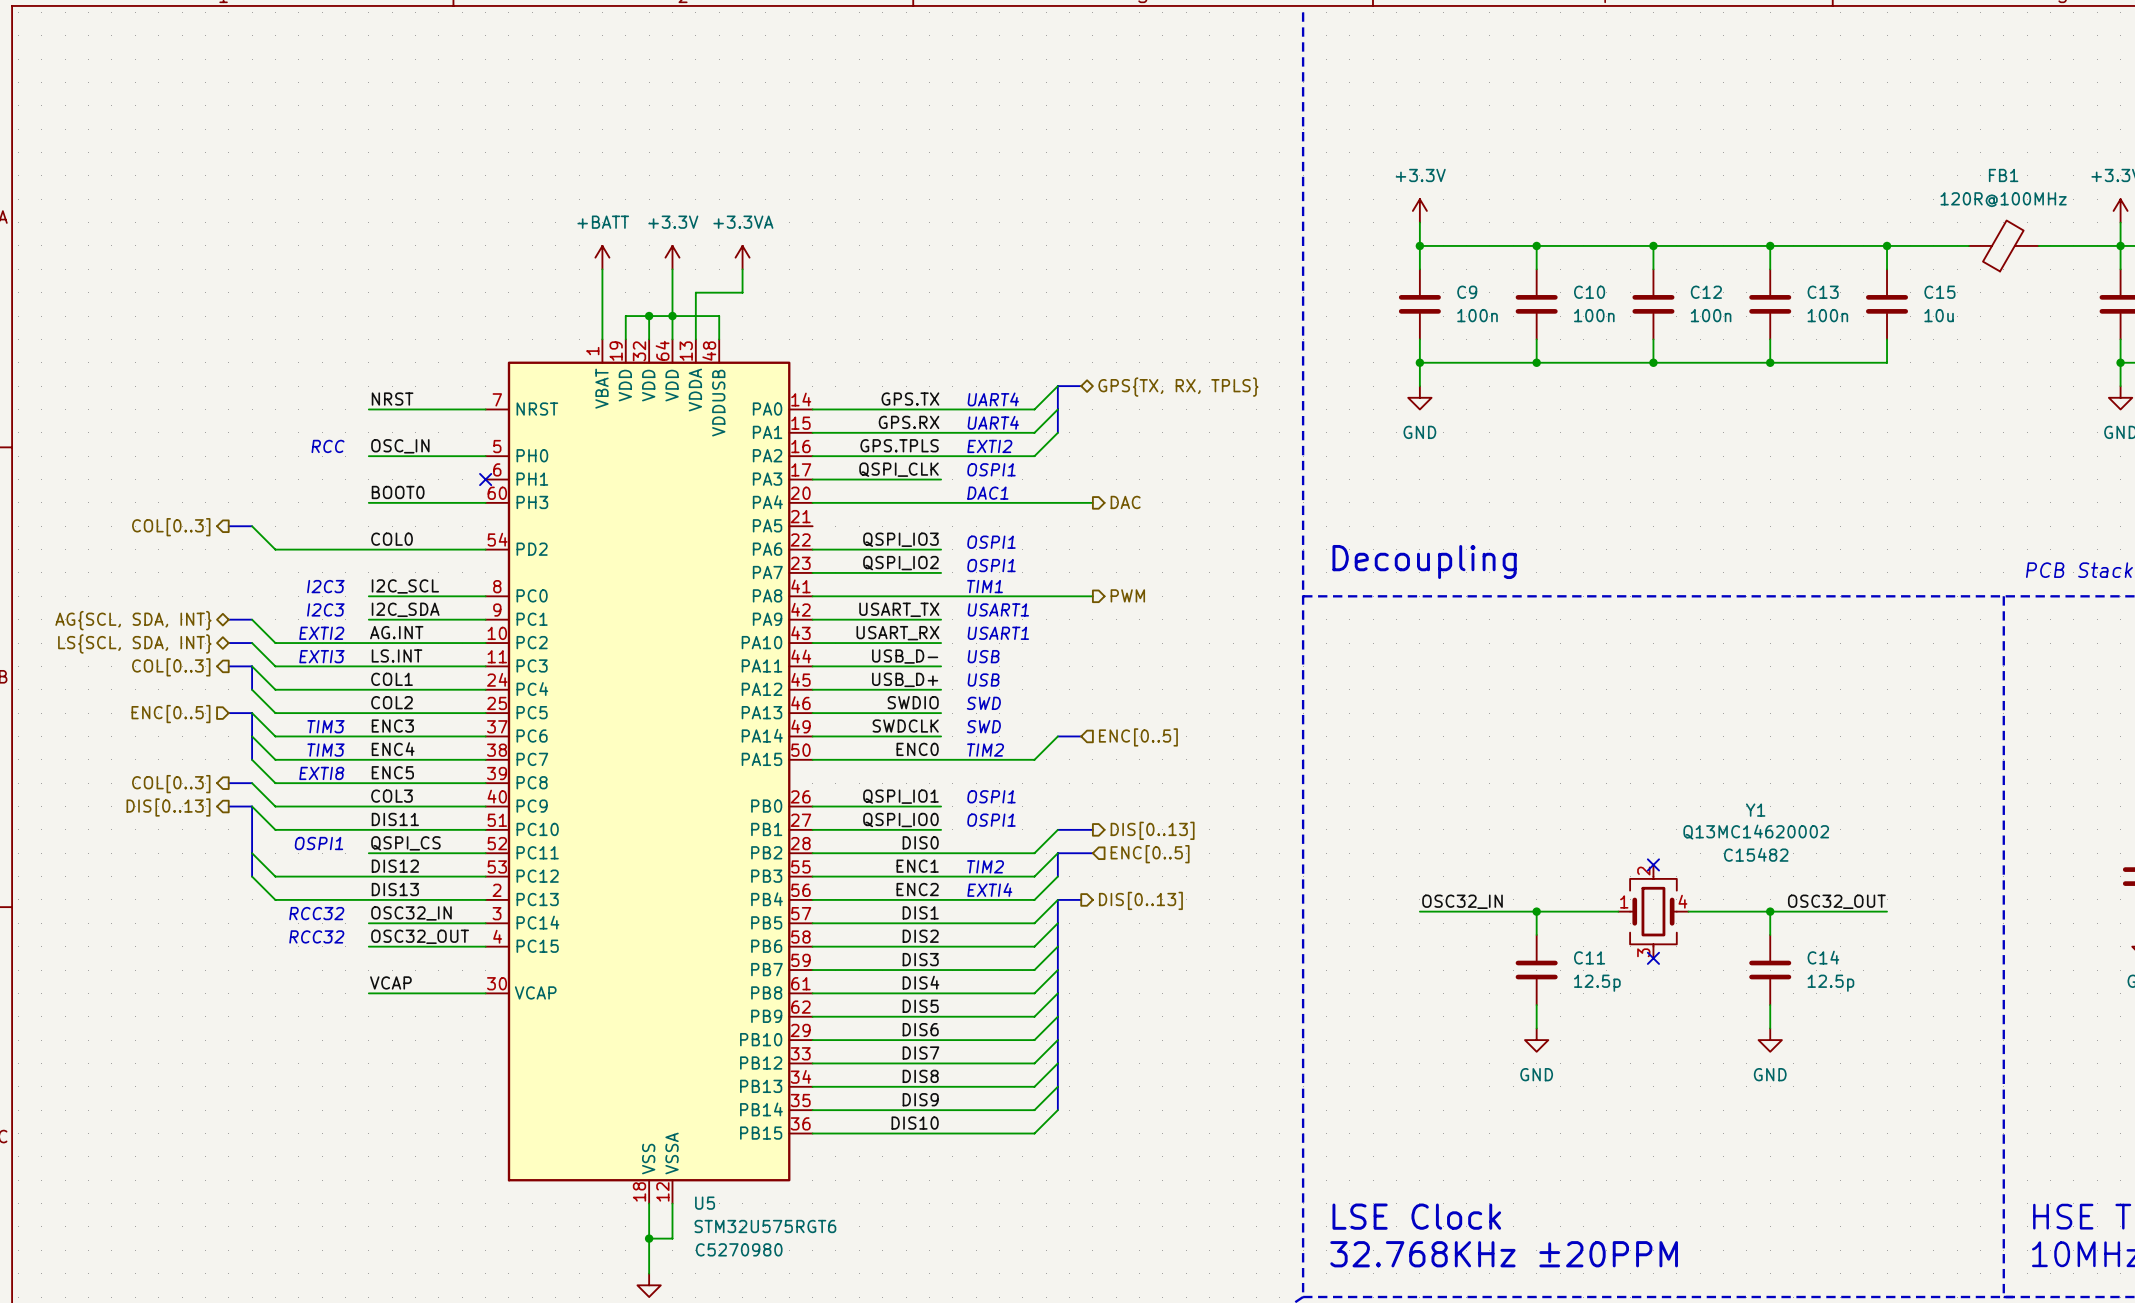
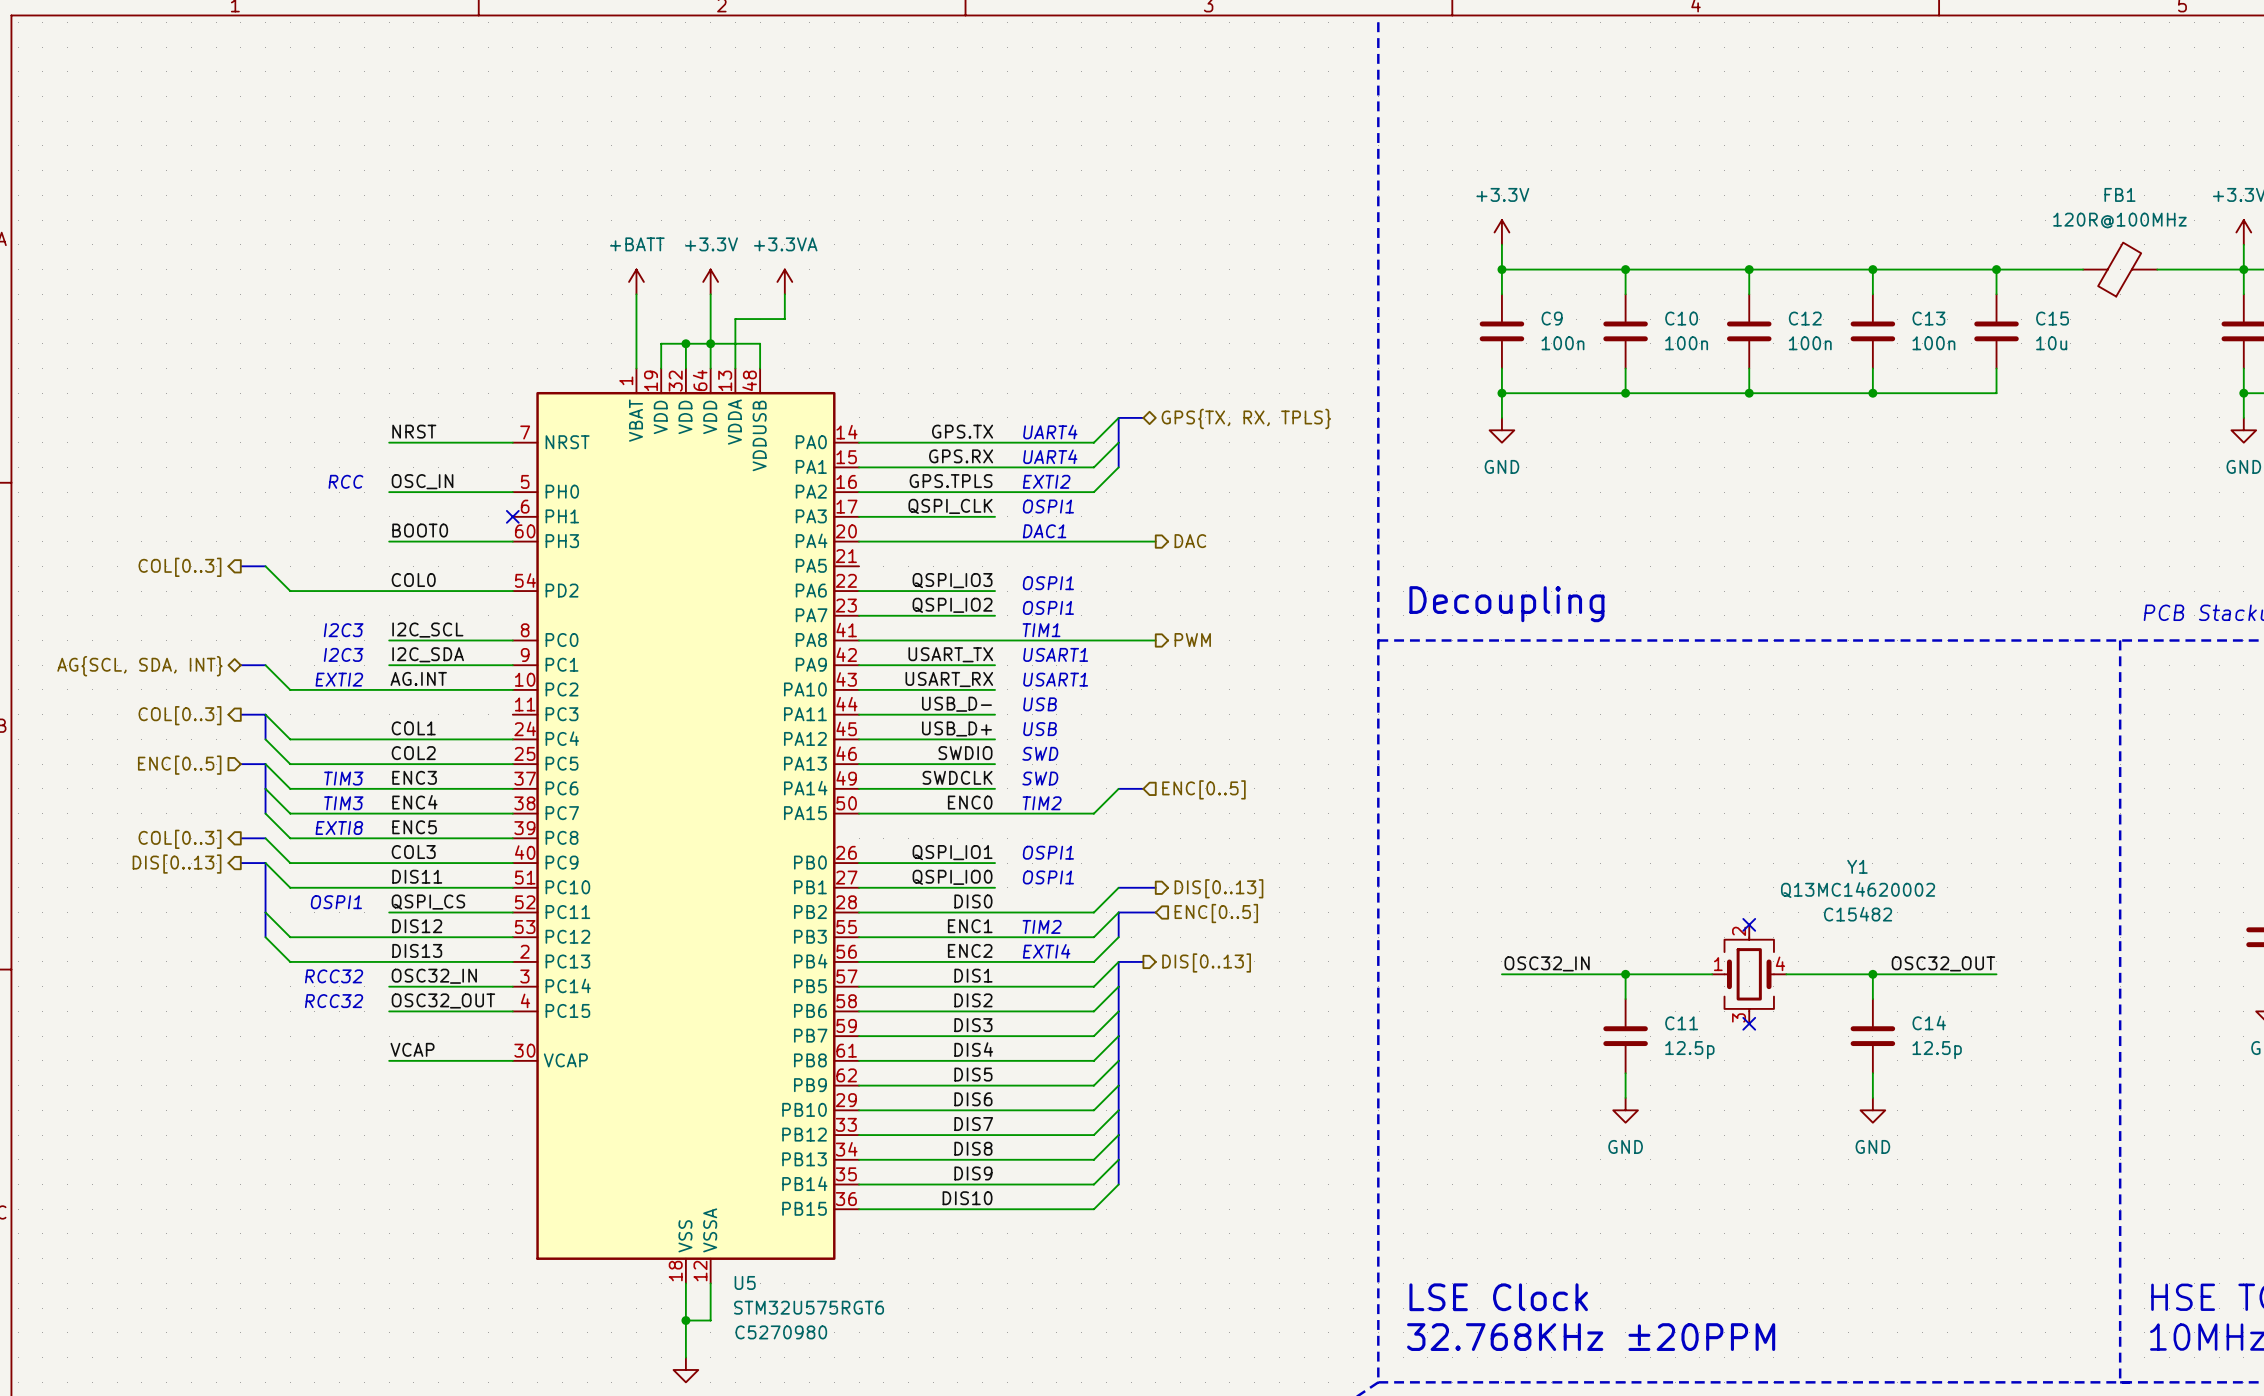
hierarchical label: LS{SCL, SDA, INT} (134, 643) -> none
bus: (228, 643) (252, 643) -> none
wire: (252, 643) (275, 666) (485, 666) -> none
label: LS.INT (397, 655) -> none
text: EXTI3 (321, 656) -> none

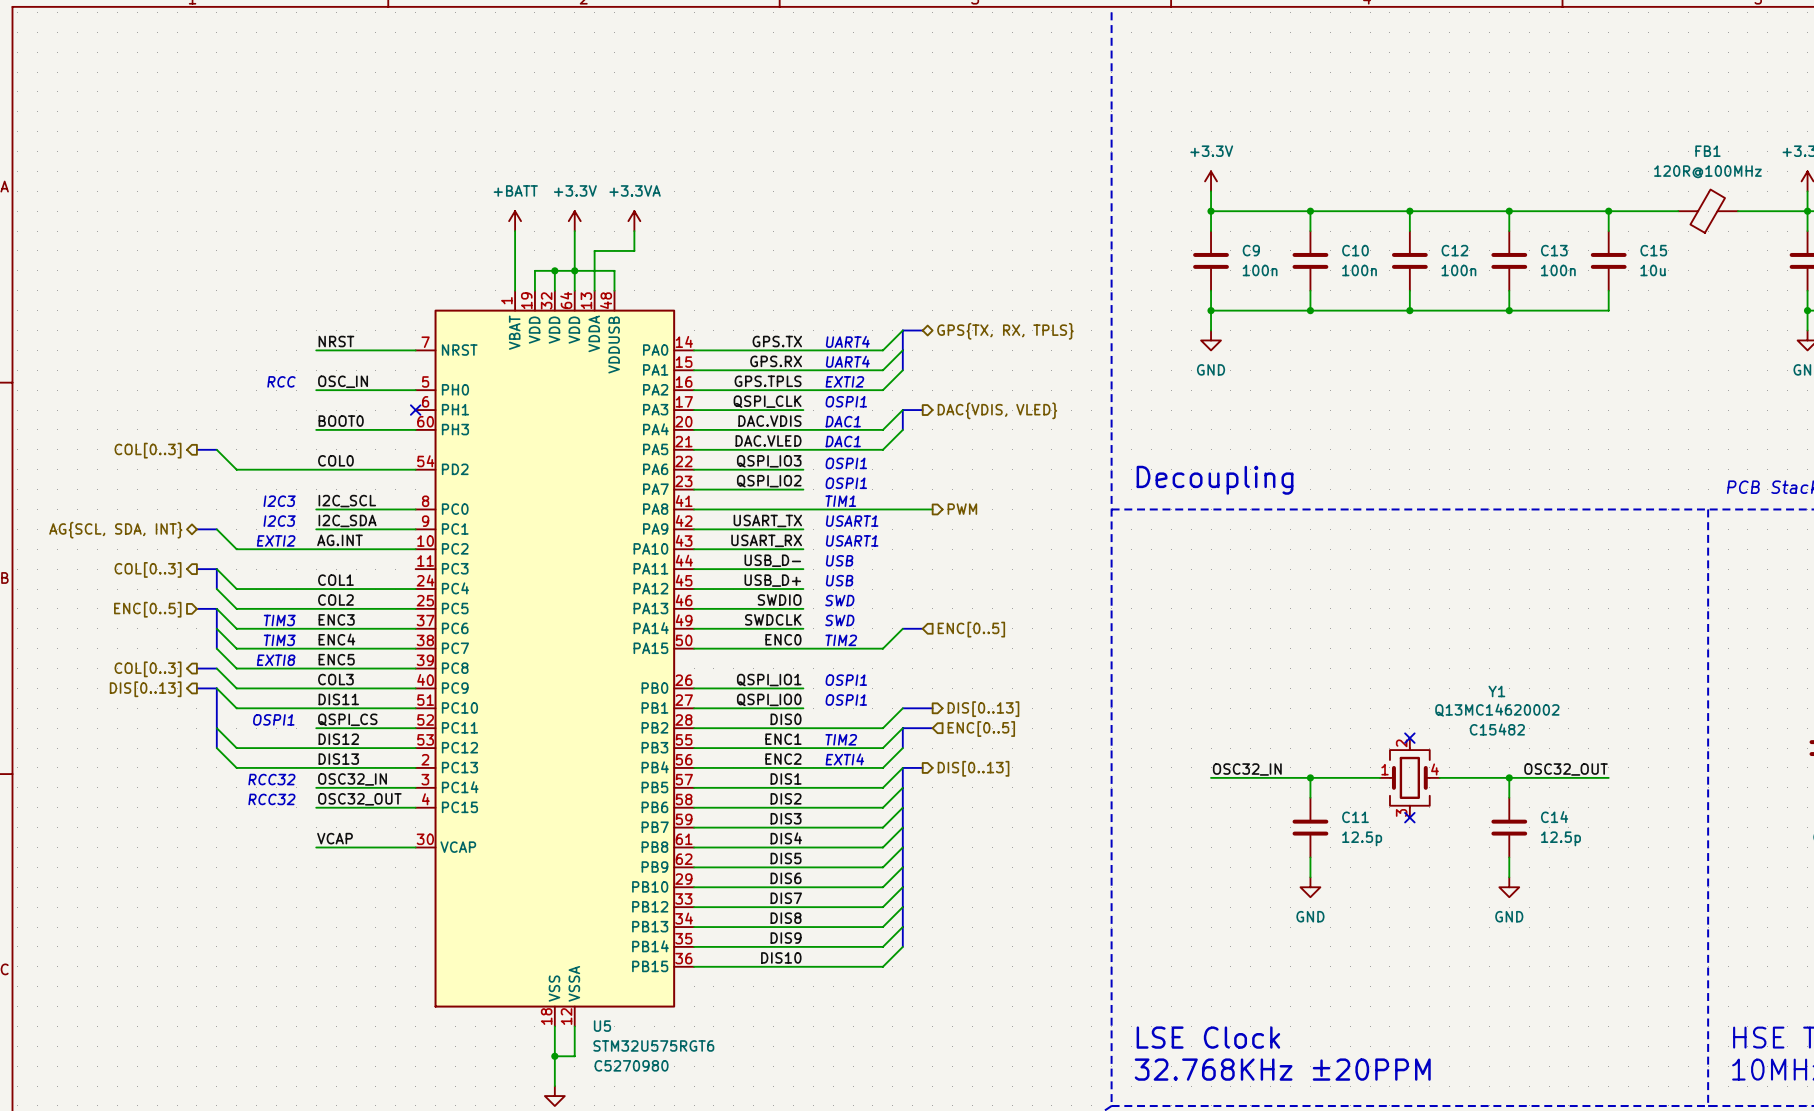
bus: none -> (922, 410) (902, 410) (902, 429)
hierarchical label: none -> DAC{VDIS, VLED} (997, 410)
label: none -> DAC.VDIS (769, 421)
wire: (1093, 541) (1155, 541) -> (882, 429) (902, 410)
wire: none -> (902, 429) (882, 449) (694, 449)
hierarchical label: DAC (1190, 541) -> none
label: none -> DAC.VLED (768, 440)
text: none -> DAC1 (843, 441)

